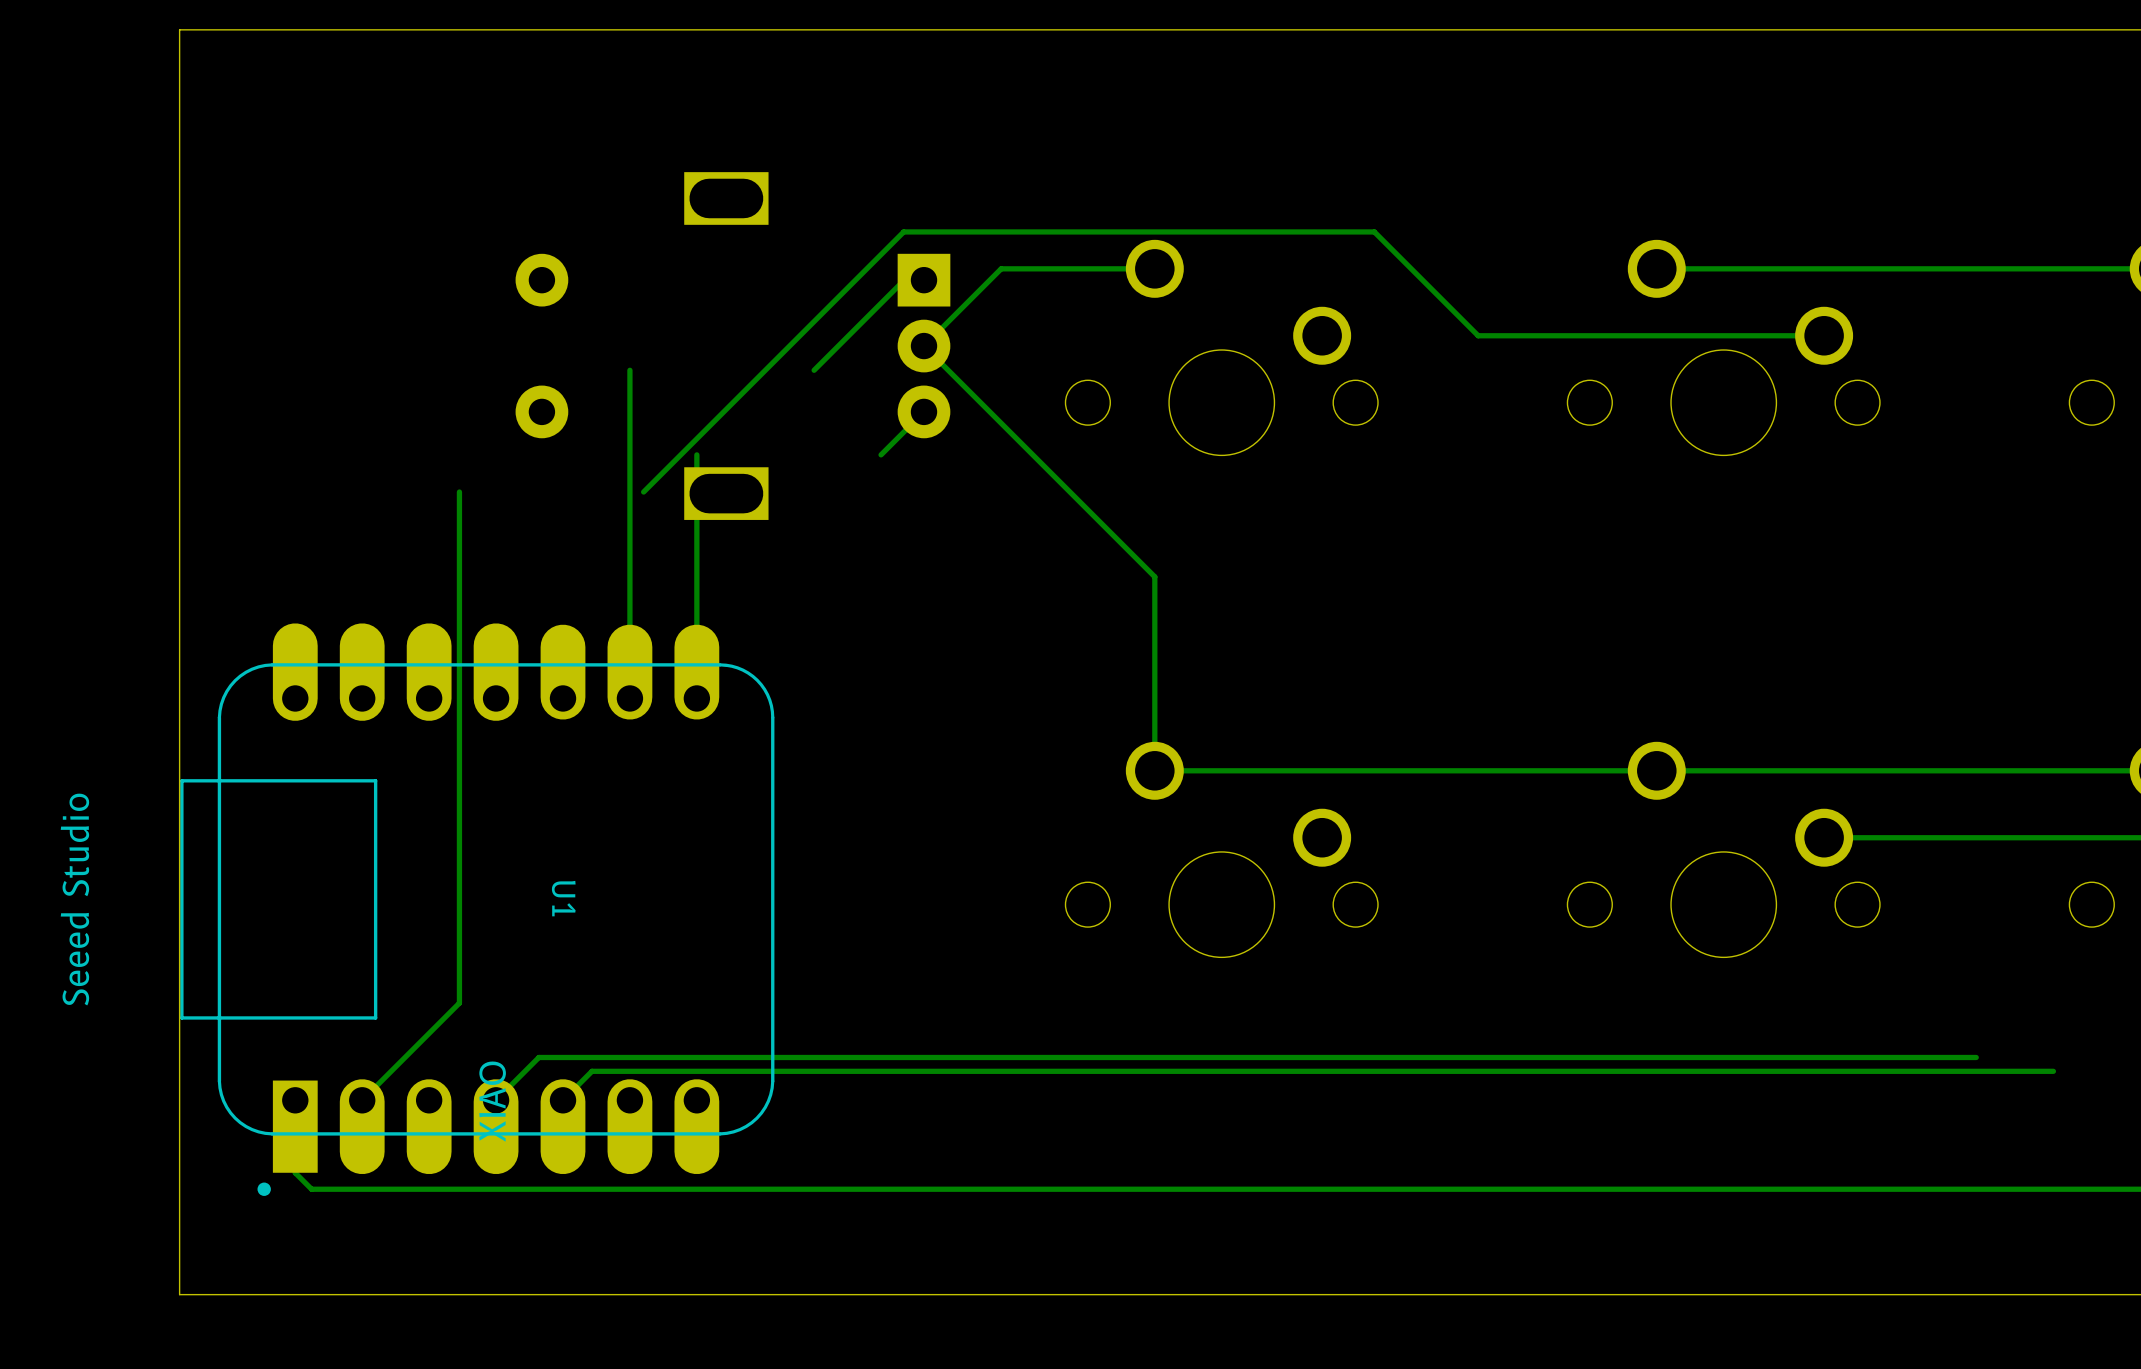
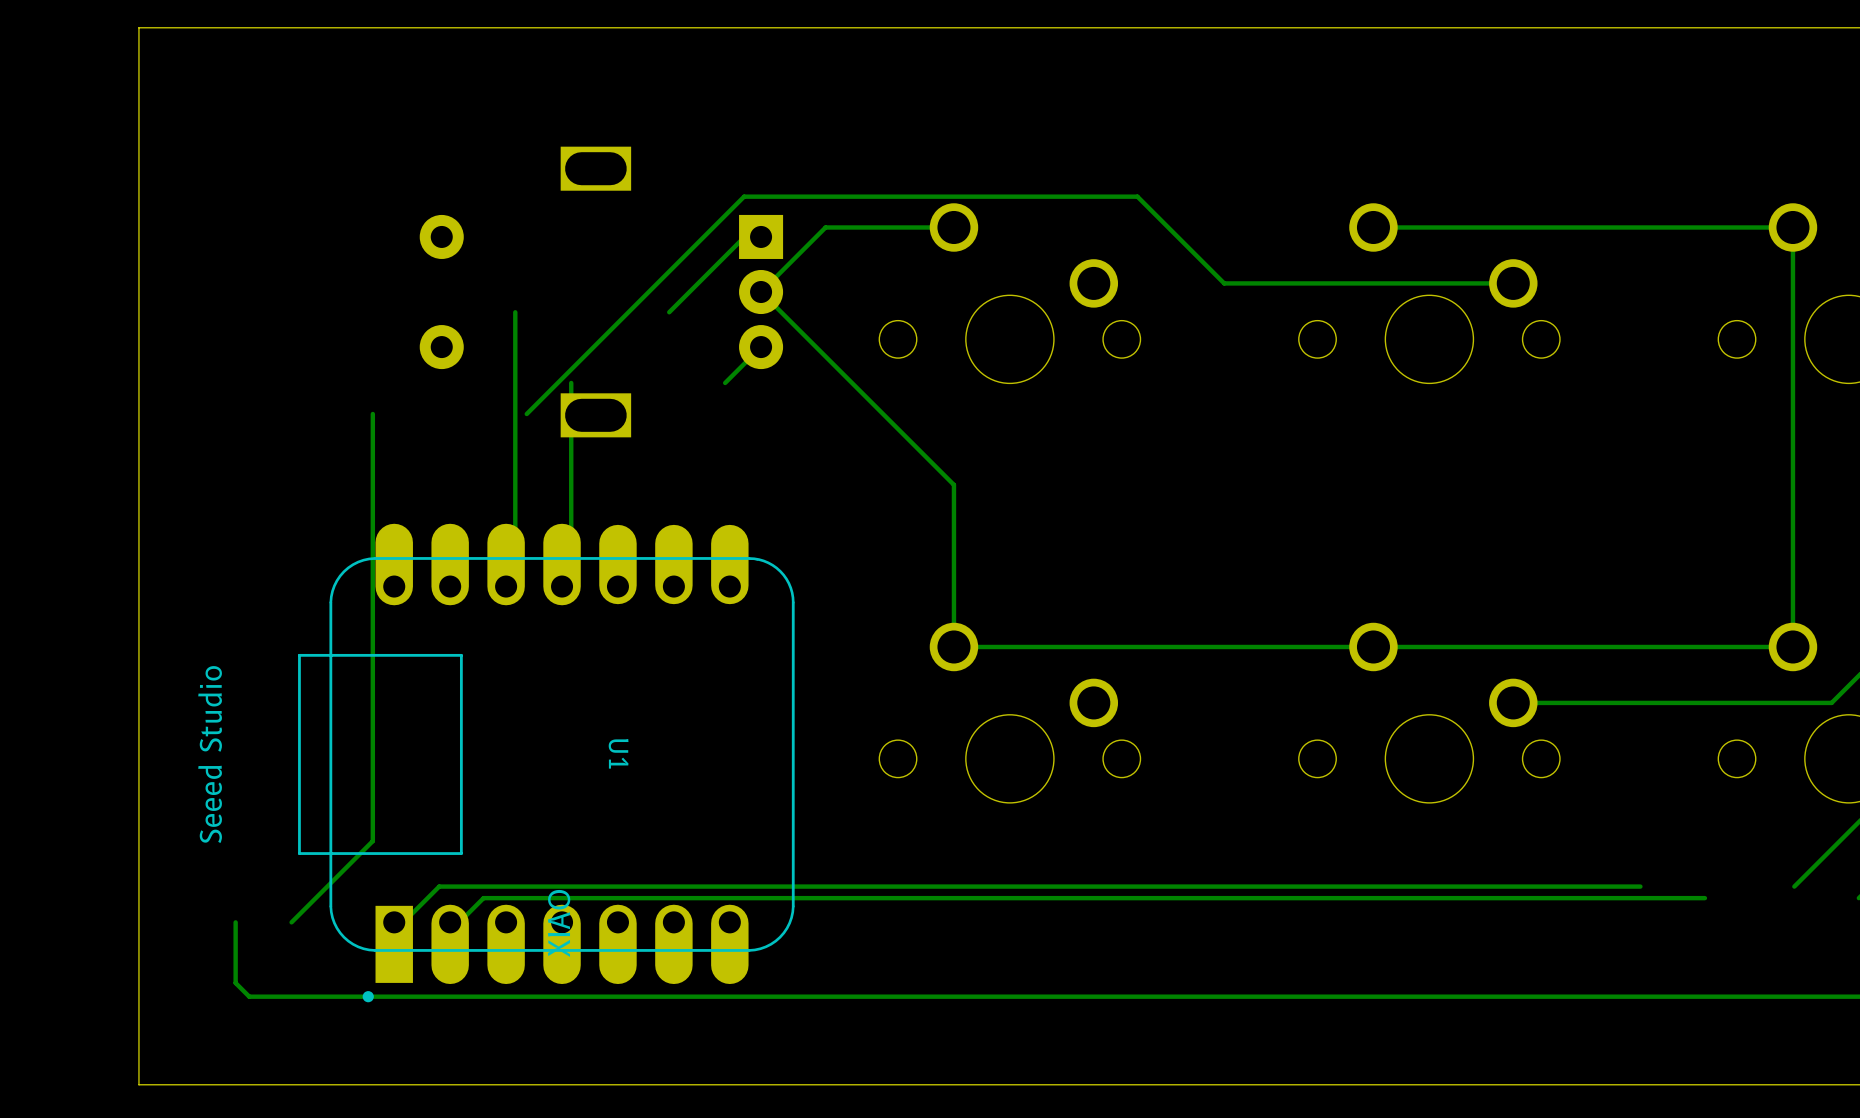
U1 position: (477, 909) -> (546, 763)

